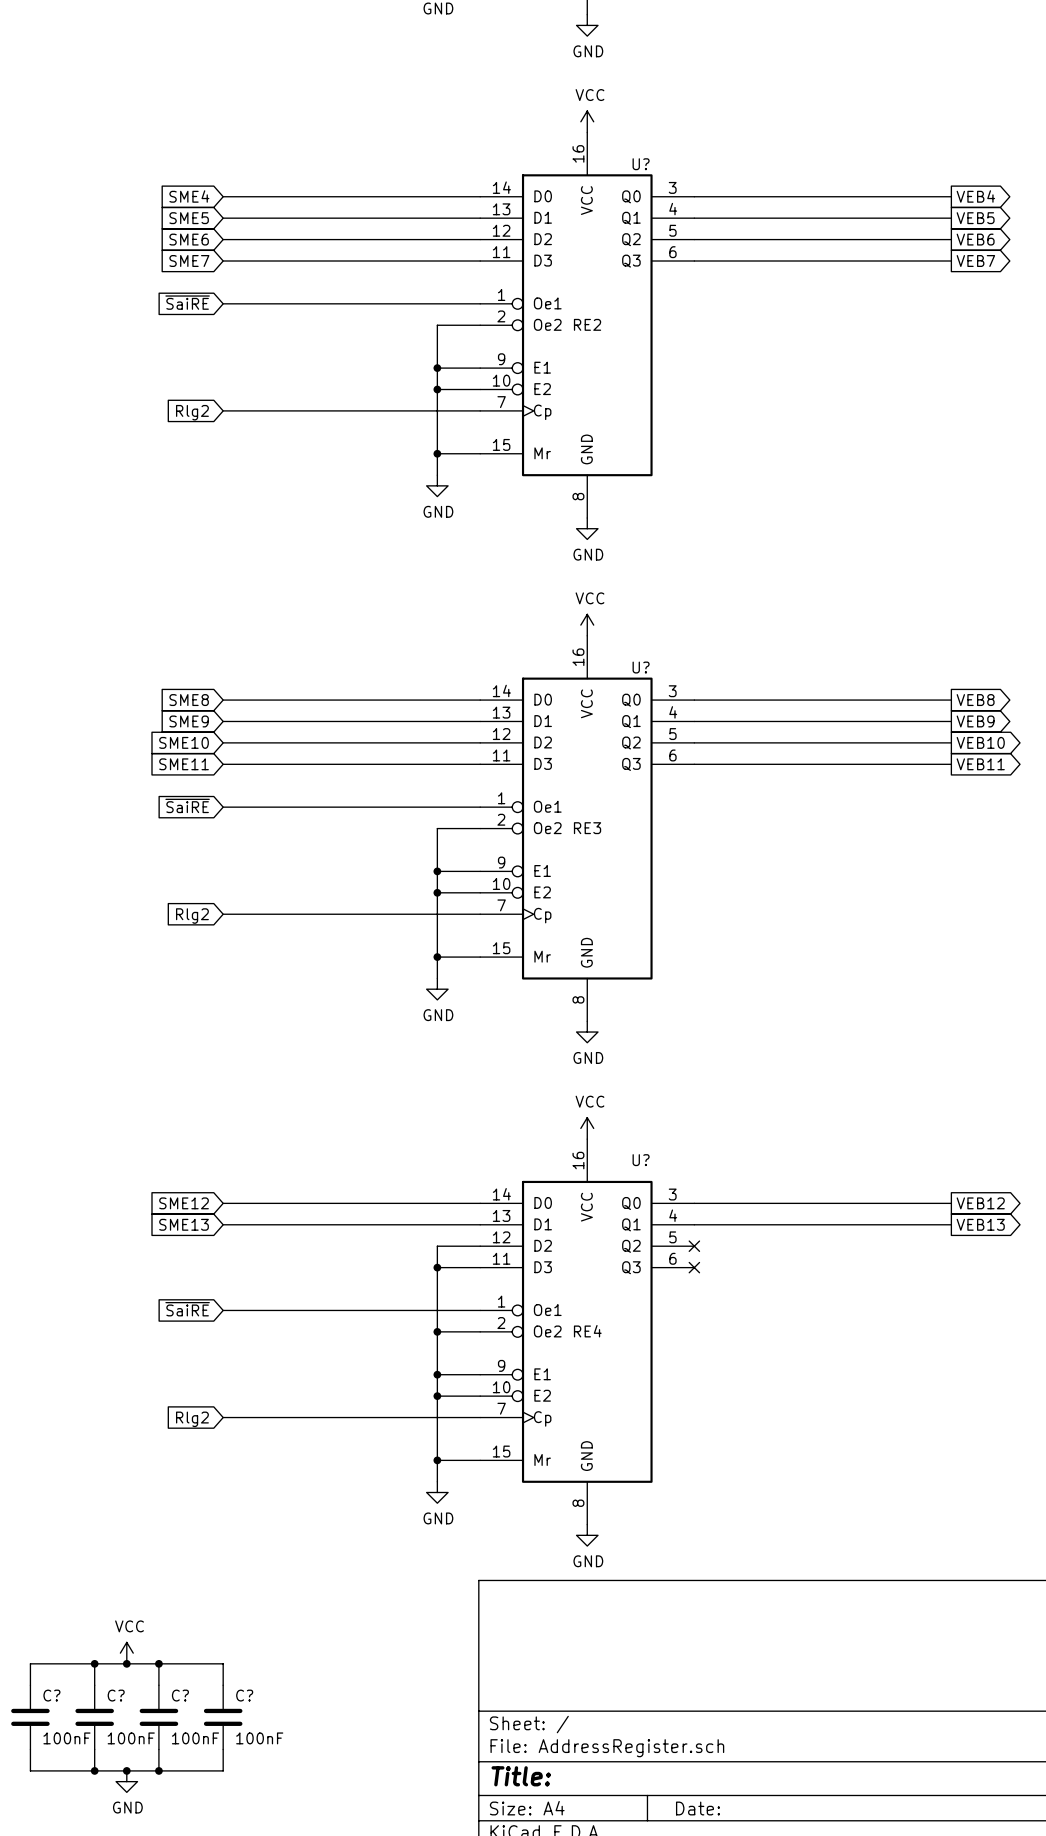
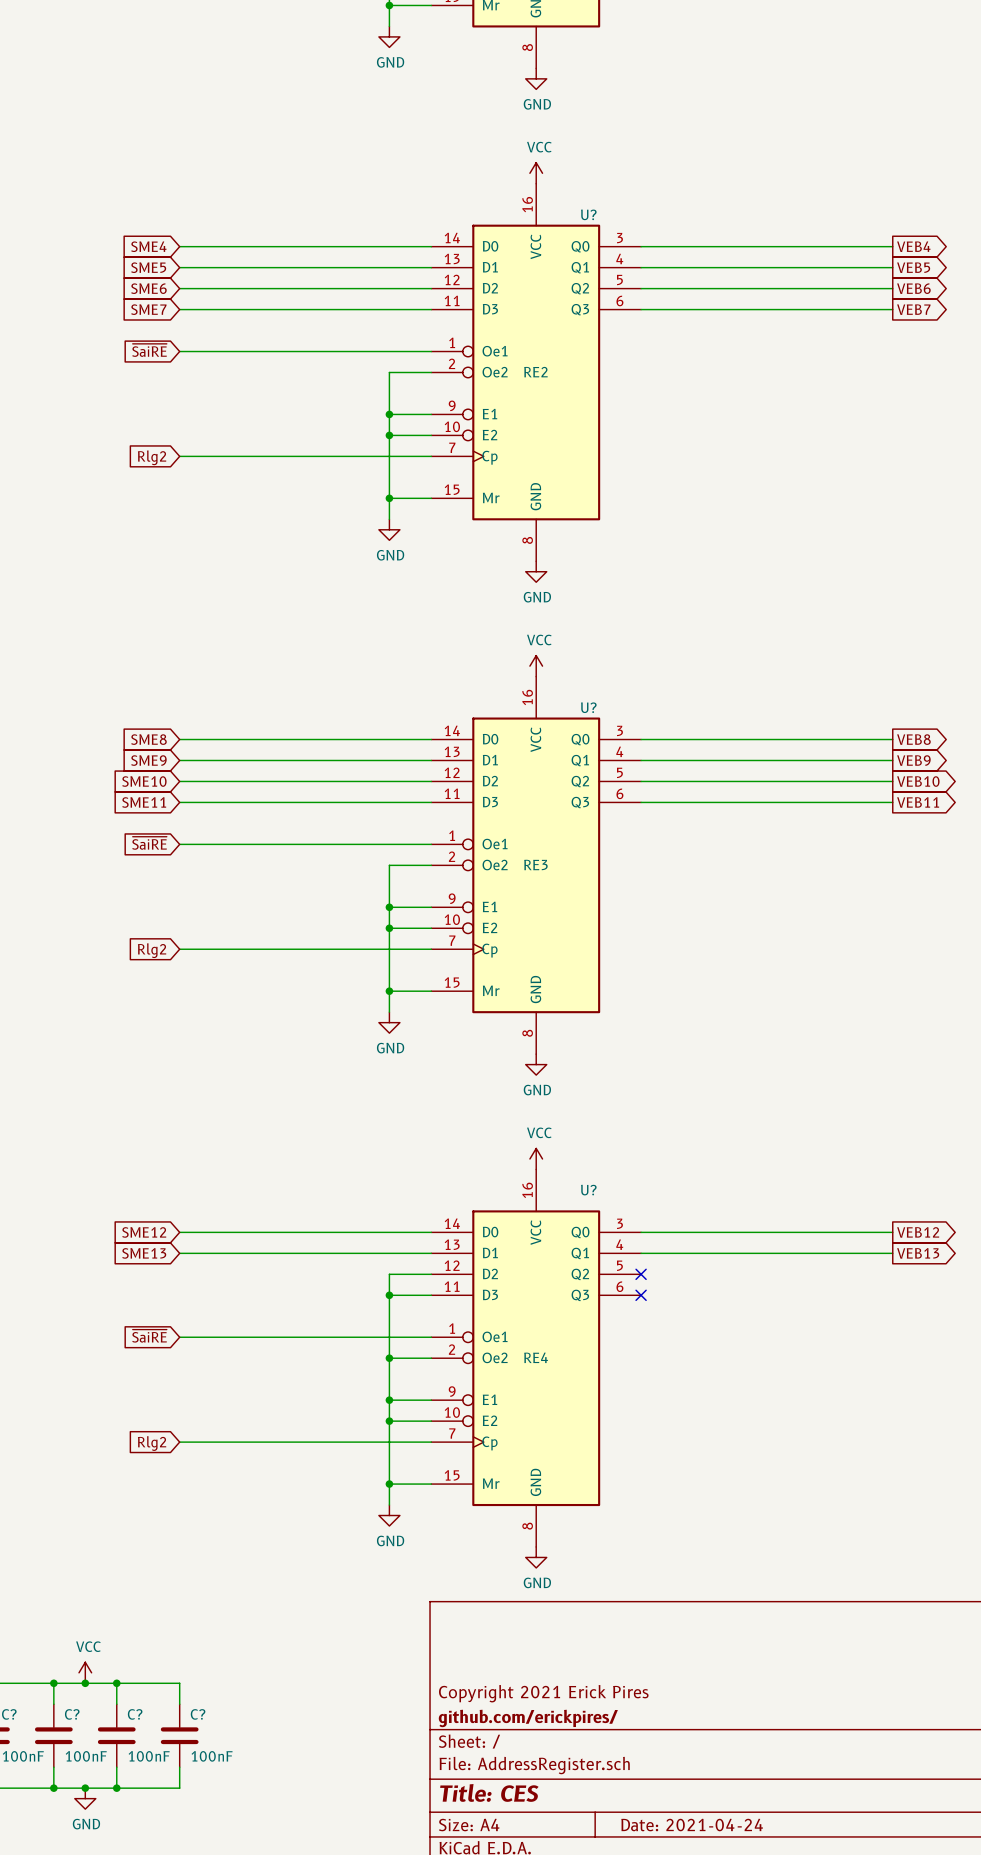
title block: none -> Copyright 2021 Erick Pires (543, 1693)
title block: none -> github.com/erickpires/ (528, 1718)
title block: Title: (521, 1776) -> Title: CES (489, 1792)
title block: Date: (697, 1808) -> Date: 2021-04-24 (692, 1825)

